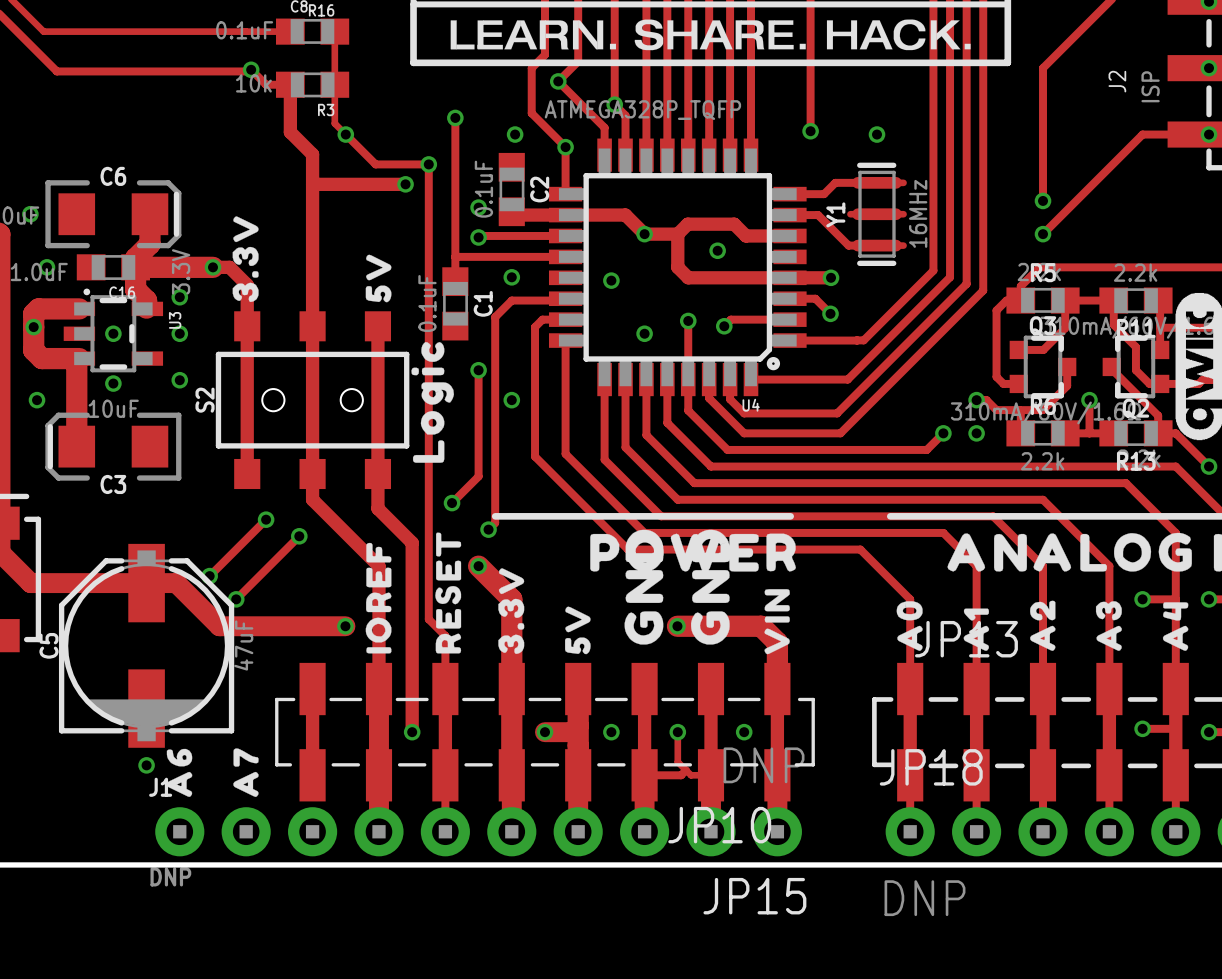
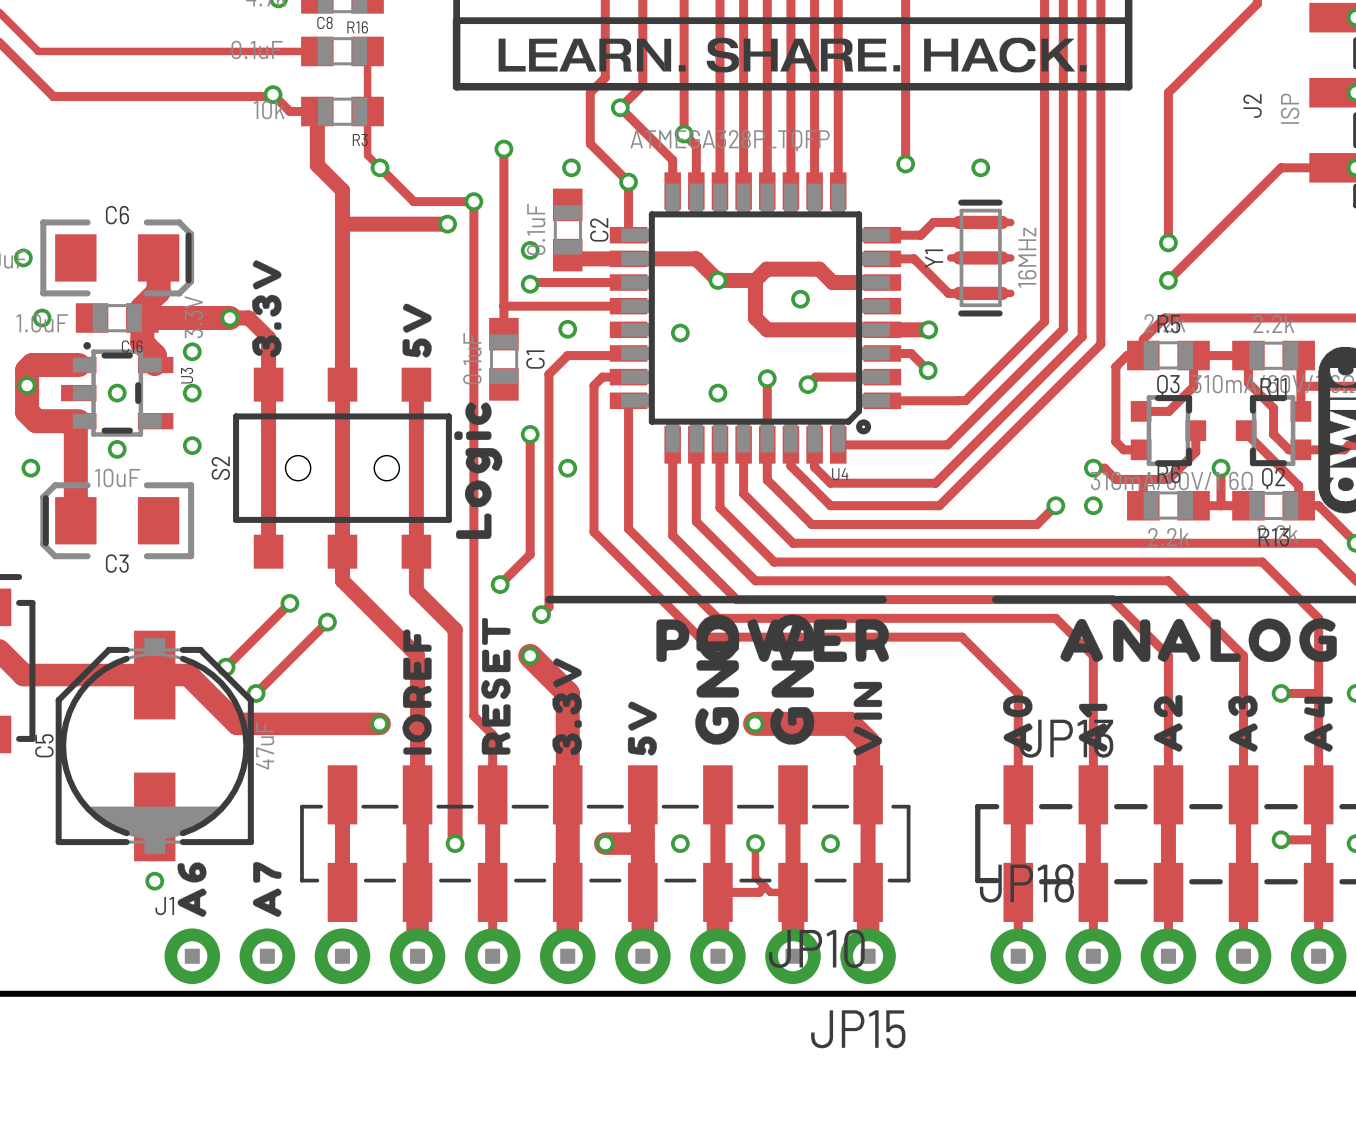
JP15 value: DNP (764, 765) -> none
J1 value: DNP (170, 876) -> none
JP18 value: DNP (924, 898) -> none

